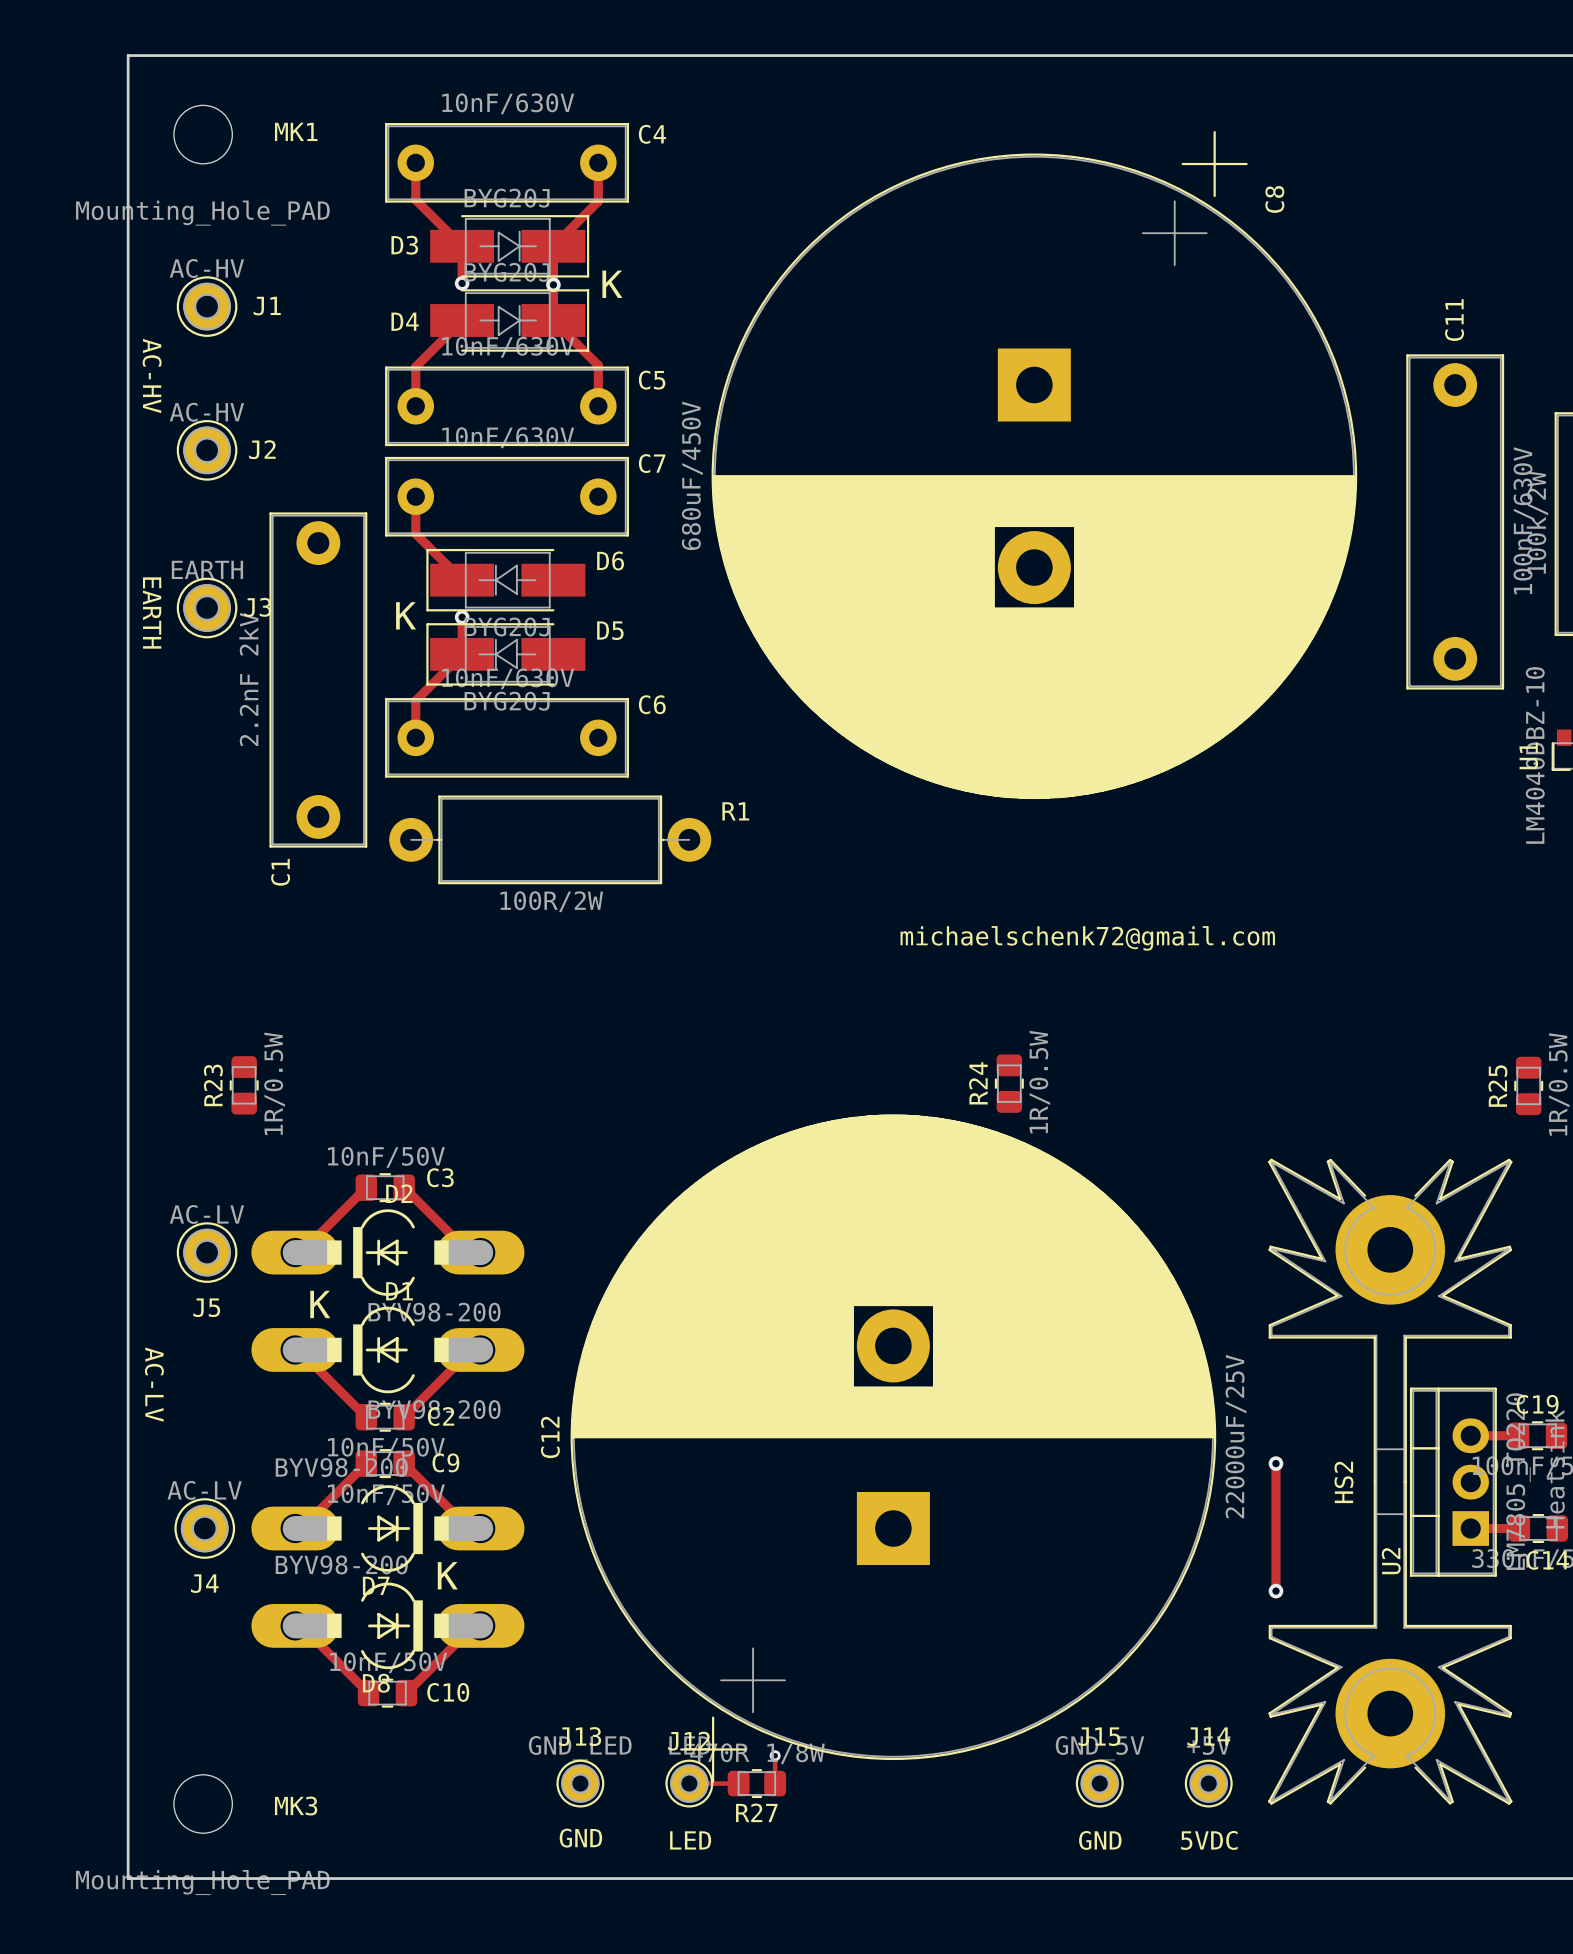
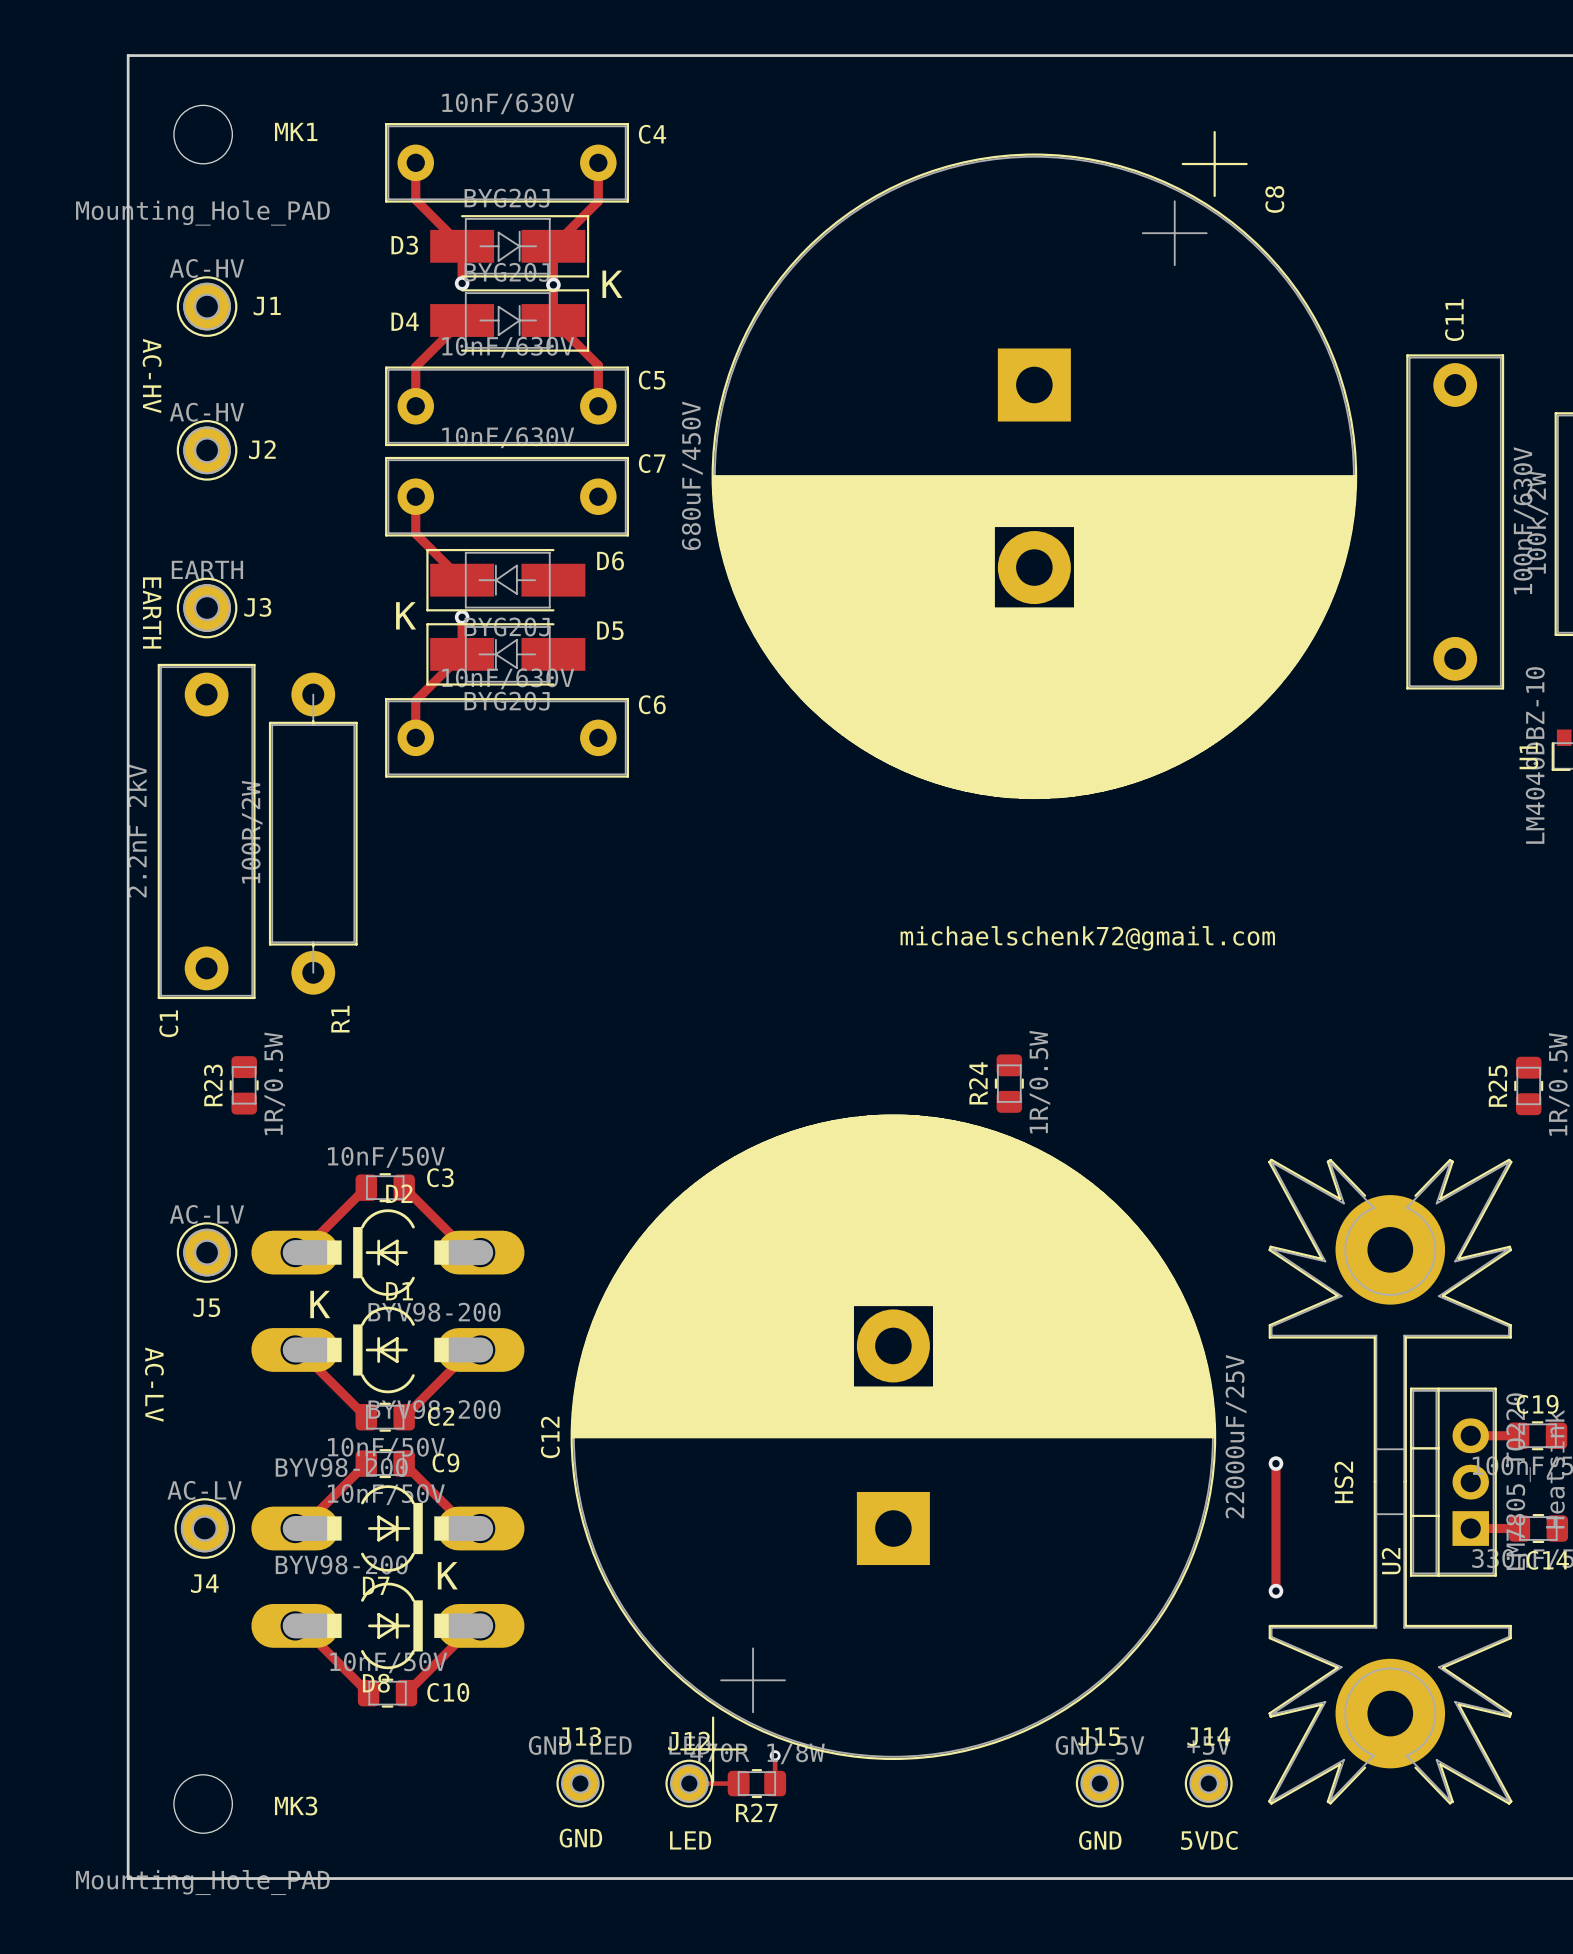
C1 position: (318, 680) -> (206, 831)
R1 rotation: 0° (550, 839) -> 90° clockwise (313, 833)
R1 position: (550, 839) -> (313, 833)

